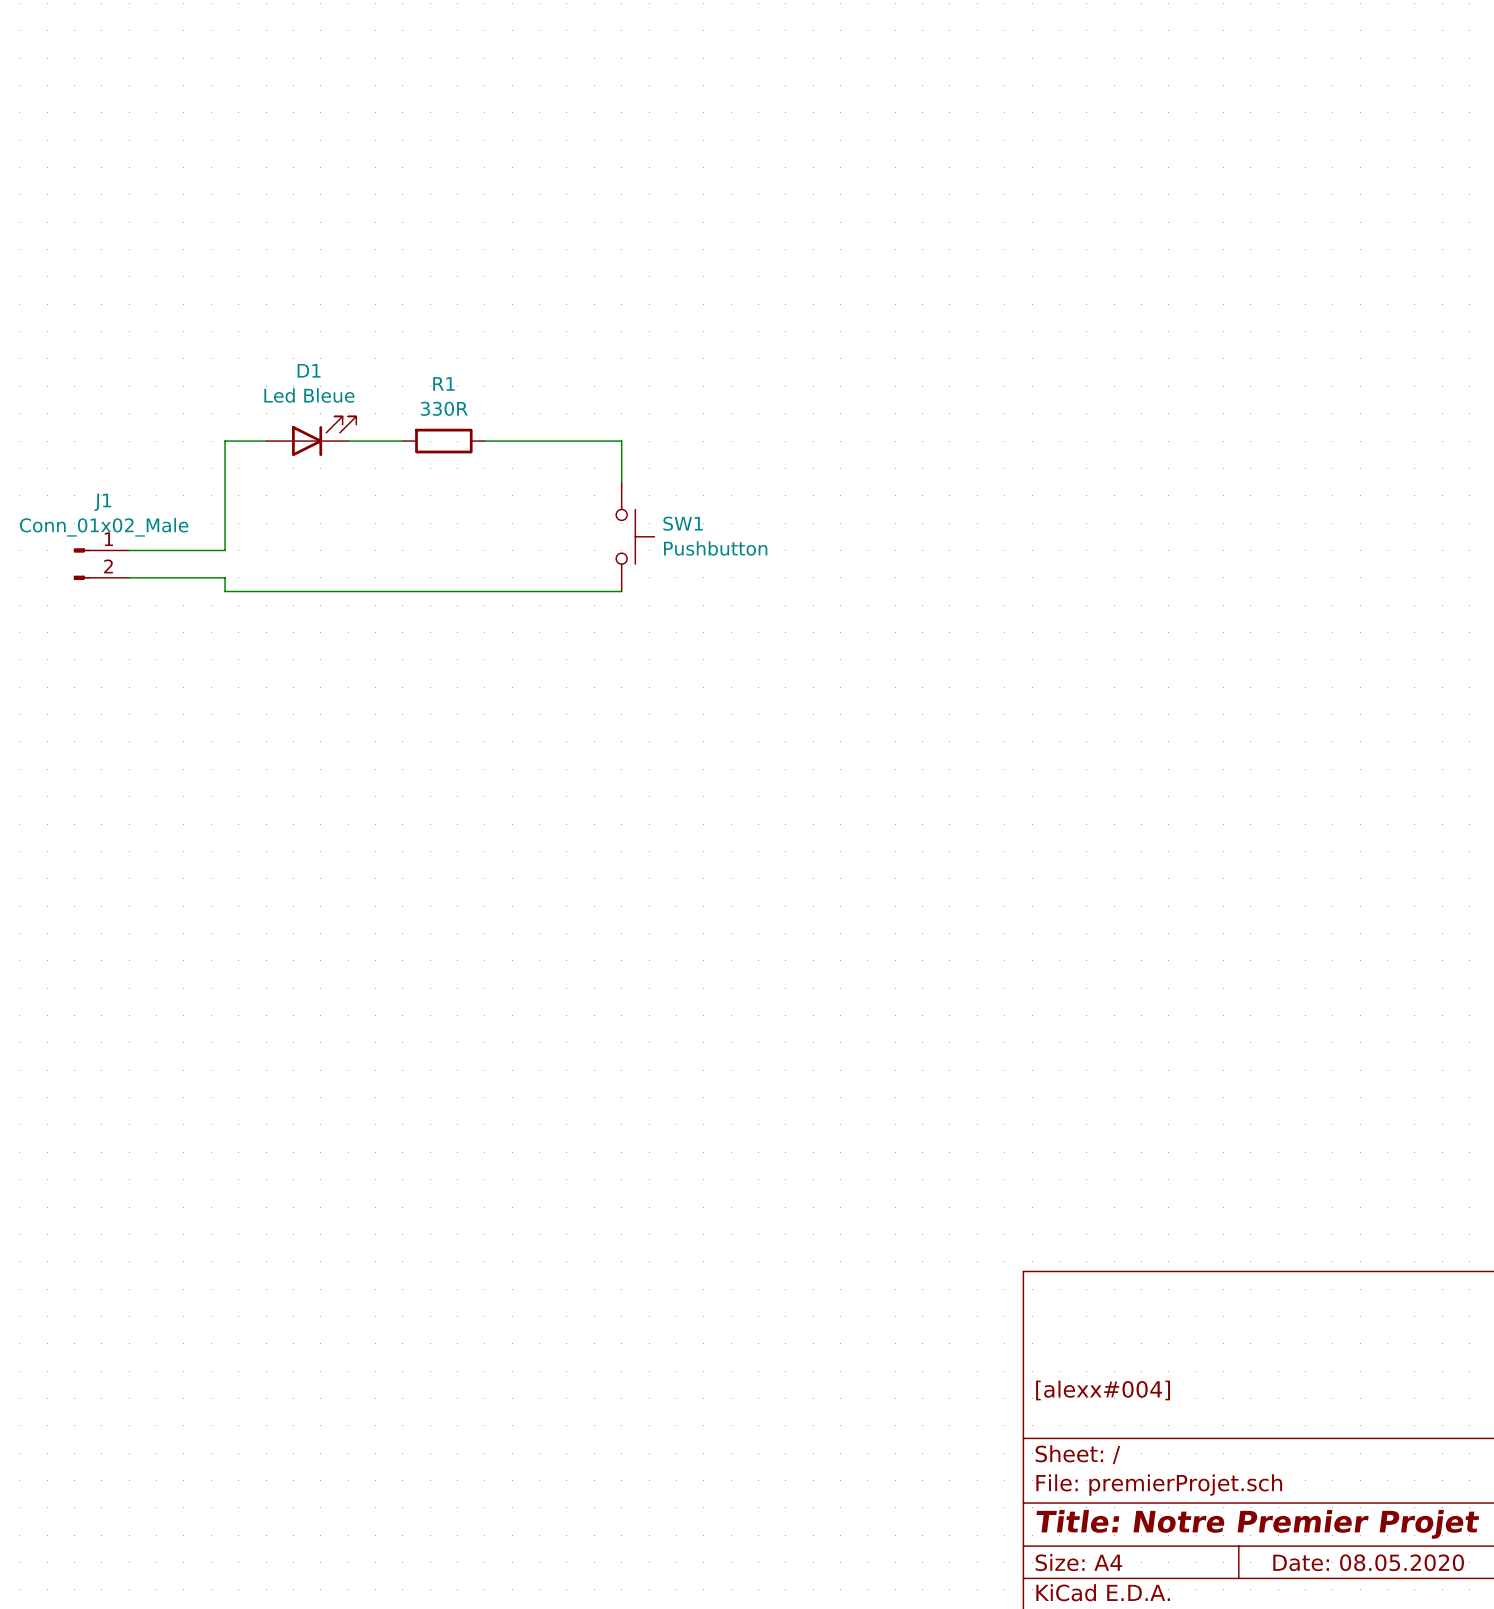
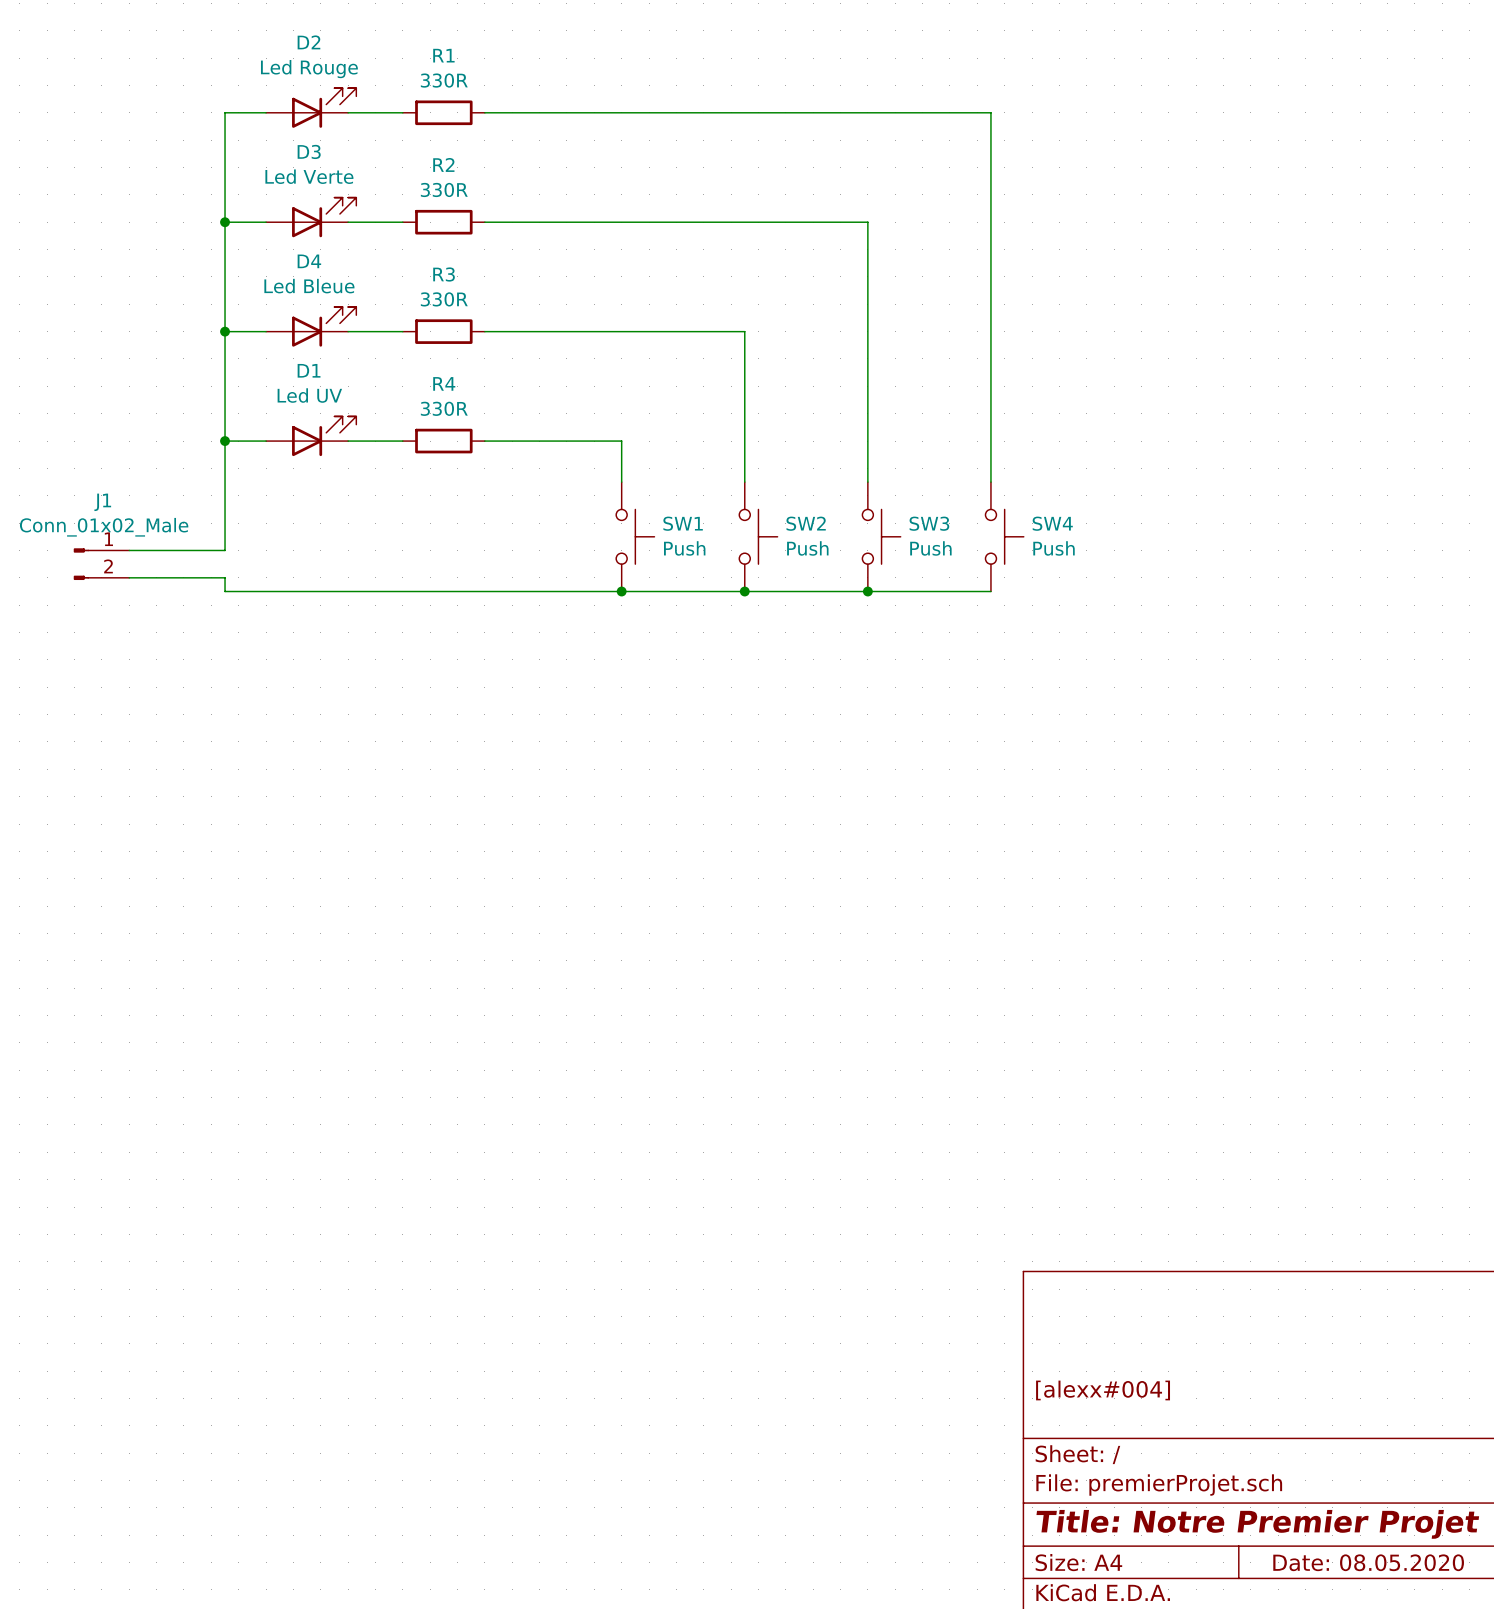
D2: none -> Led Rouge (311, 108)
wire: none -> (266, 112) (225, 112) (225, 441)
wire: none -> (348, 112) (402, 112)
R1: none -> 330R (443, 112)
wire: none -> (484, 112) (990, 112) (990, 482)
D3: none -> Led Verte (311, 217)
wire: none -> (225, 222) (266, 222)
junction: none -> (225, 222)
wire: none -> (348, 222) (402, 222)
R2: none -> 330R (443, 222)
wire: none -> (484, 222) (867, 222) (867, 482)
D4: none -> Led Bleue (311, 326)
wire: none -> (225, 331) (266, 331)
junction: none -> (225, 331)
wire: none -> (348, 331) (402, 331)
R3: none -> 330R (443, 331)
wire: none -> (484, 331) (744, 331) (744, 482)
R1 name: R1 (443, 383) -> R4 (444, 383)
D1 value: Led Bleue (309, 395) -> Led UV (309, 395)
junction: none -> (225, 441)
SW2: none -> Push (758, 536)
SW3: none -> Push (881, 536)
SW4: none -> Push (1004, 536)
SW1 value: Pushbutton (715, 548) -> Push (684, 548)
wire: none -> (621, 591) (990, 591)
junction: none -> (621, 591)
junction: none -> (744, 591)
junction: none -> (867, 591)

